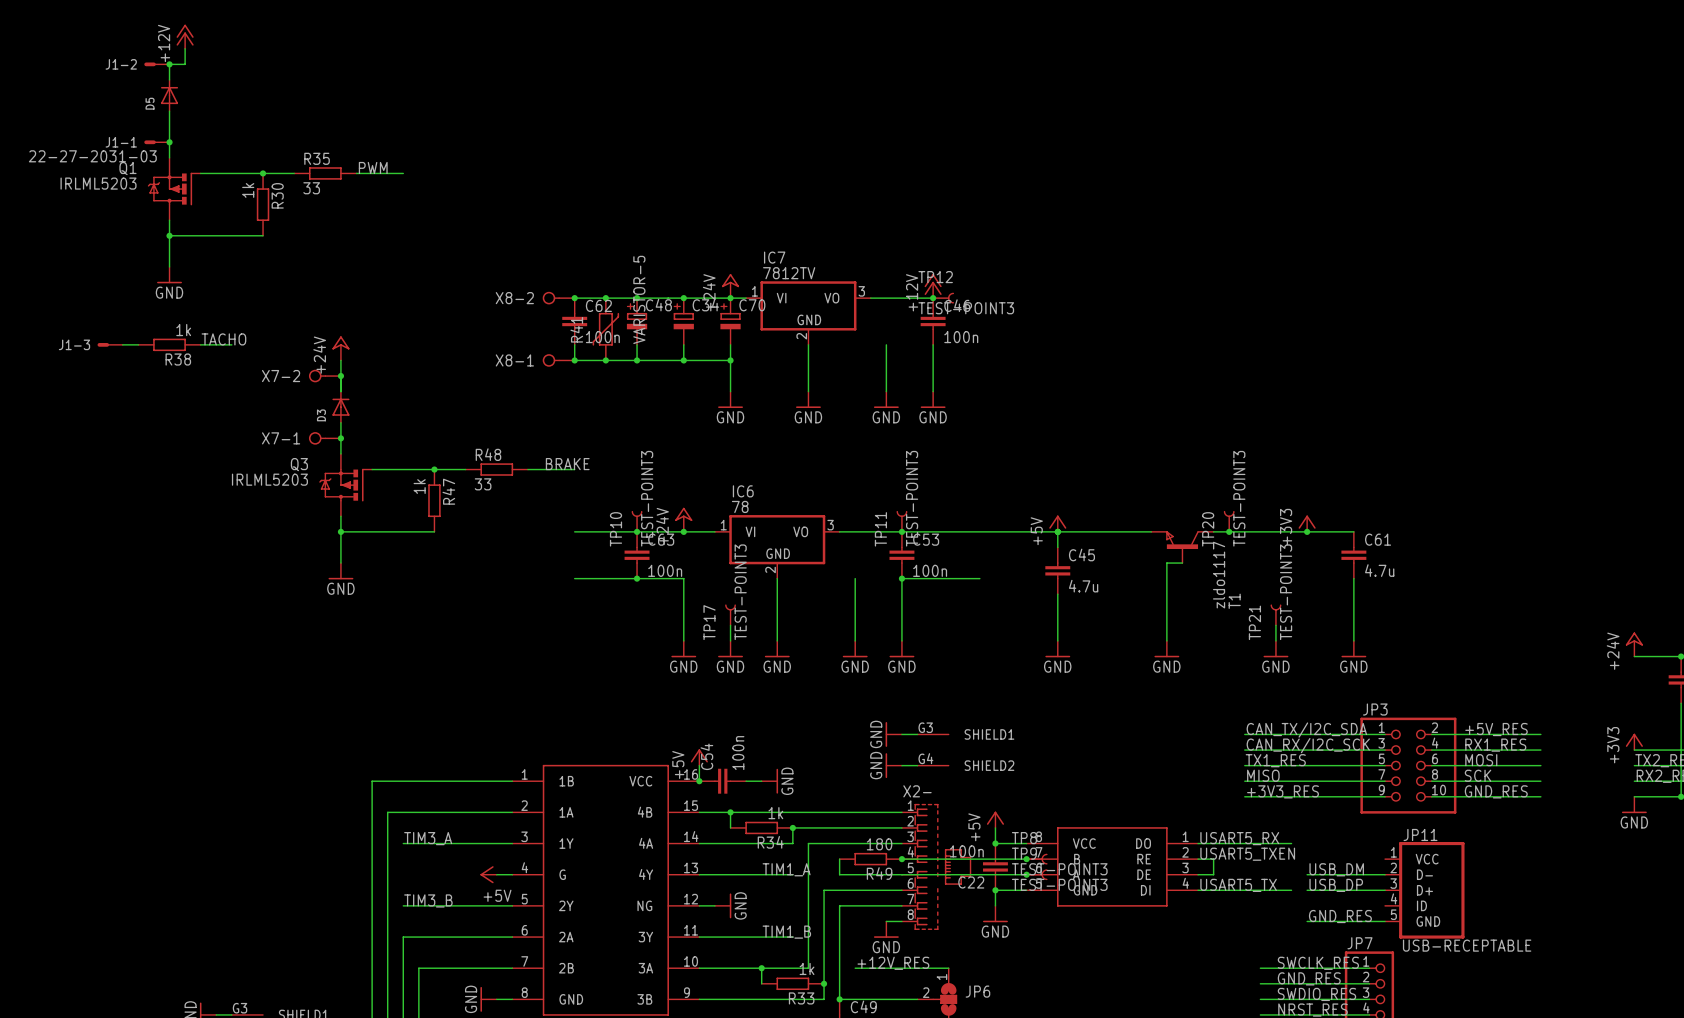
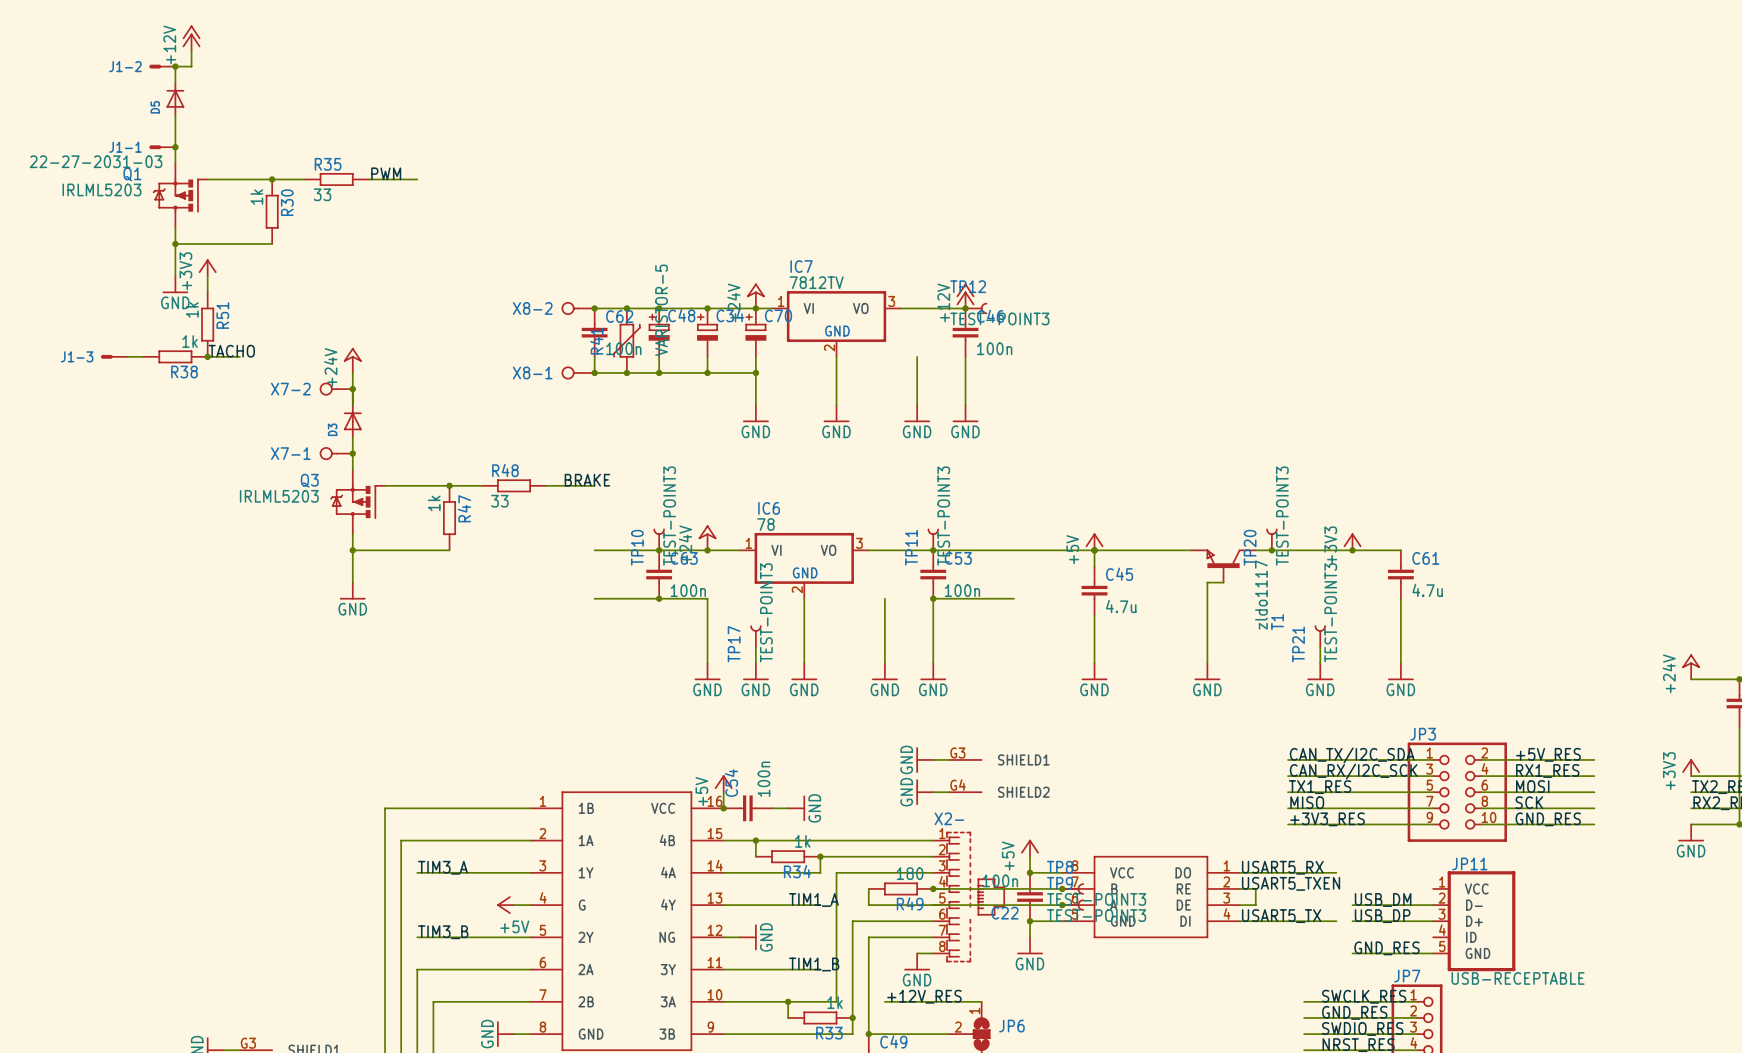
power symbol: none -> +3V3 (207, 267)
wire: none -> (207, 276) (207, 292)
R51: none -> 1k (207, 324)
junction: none -> (207, 356)

